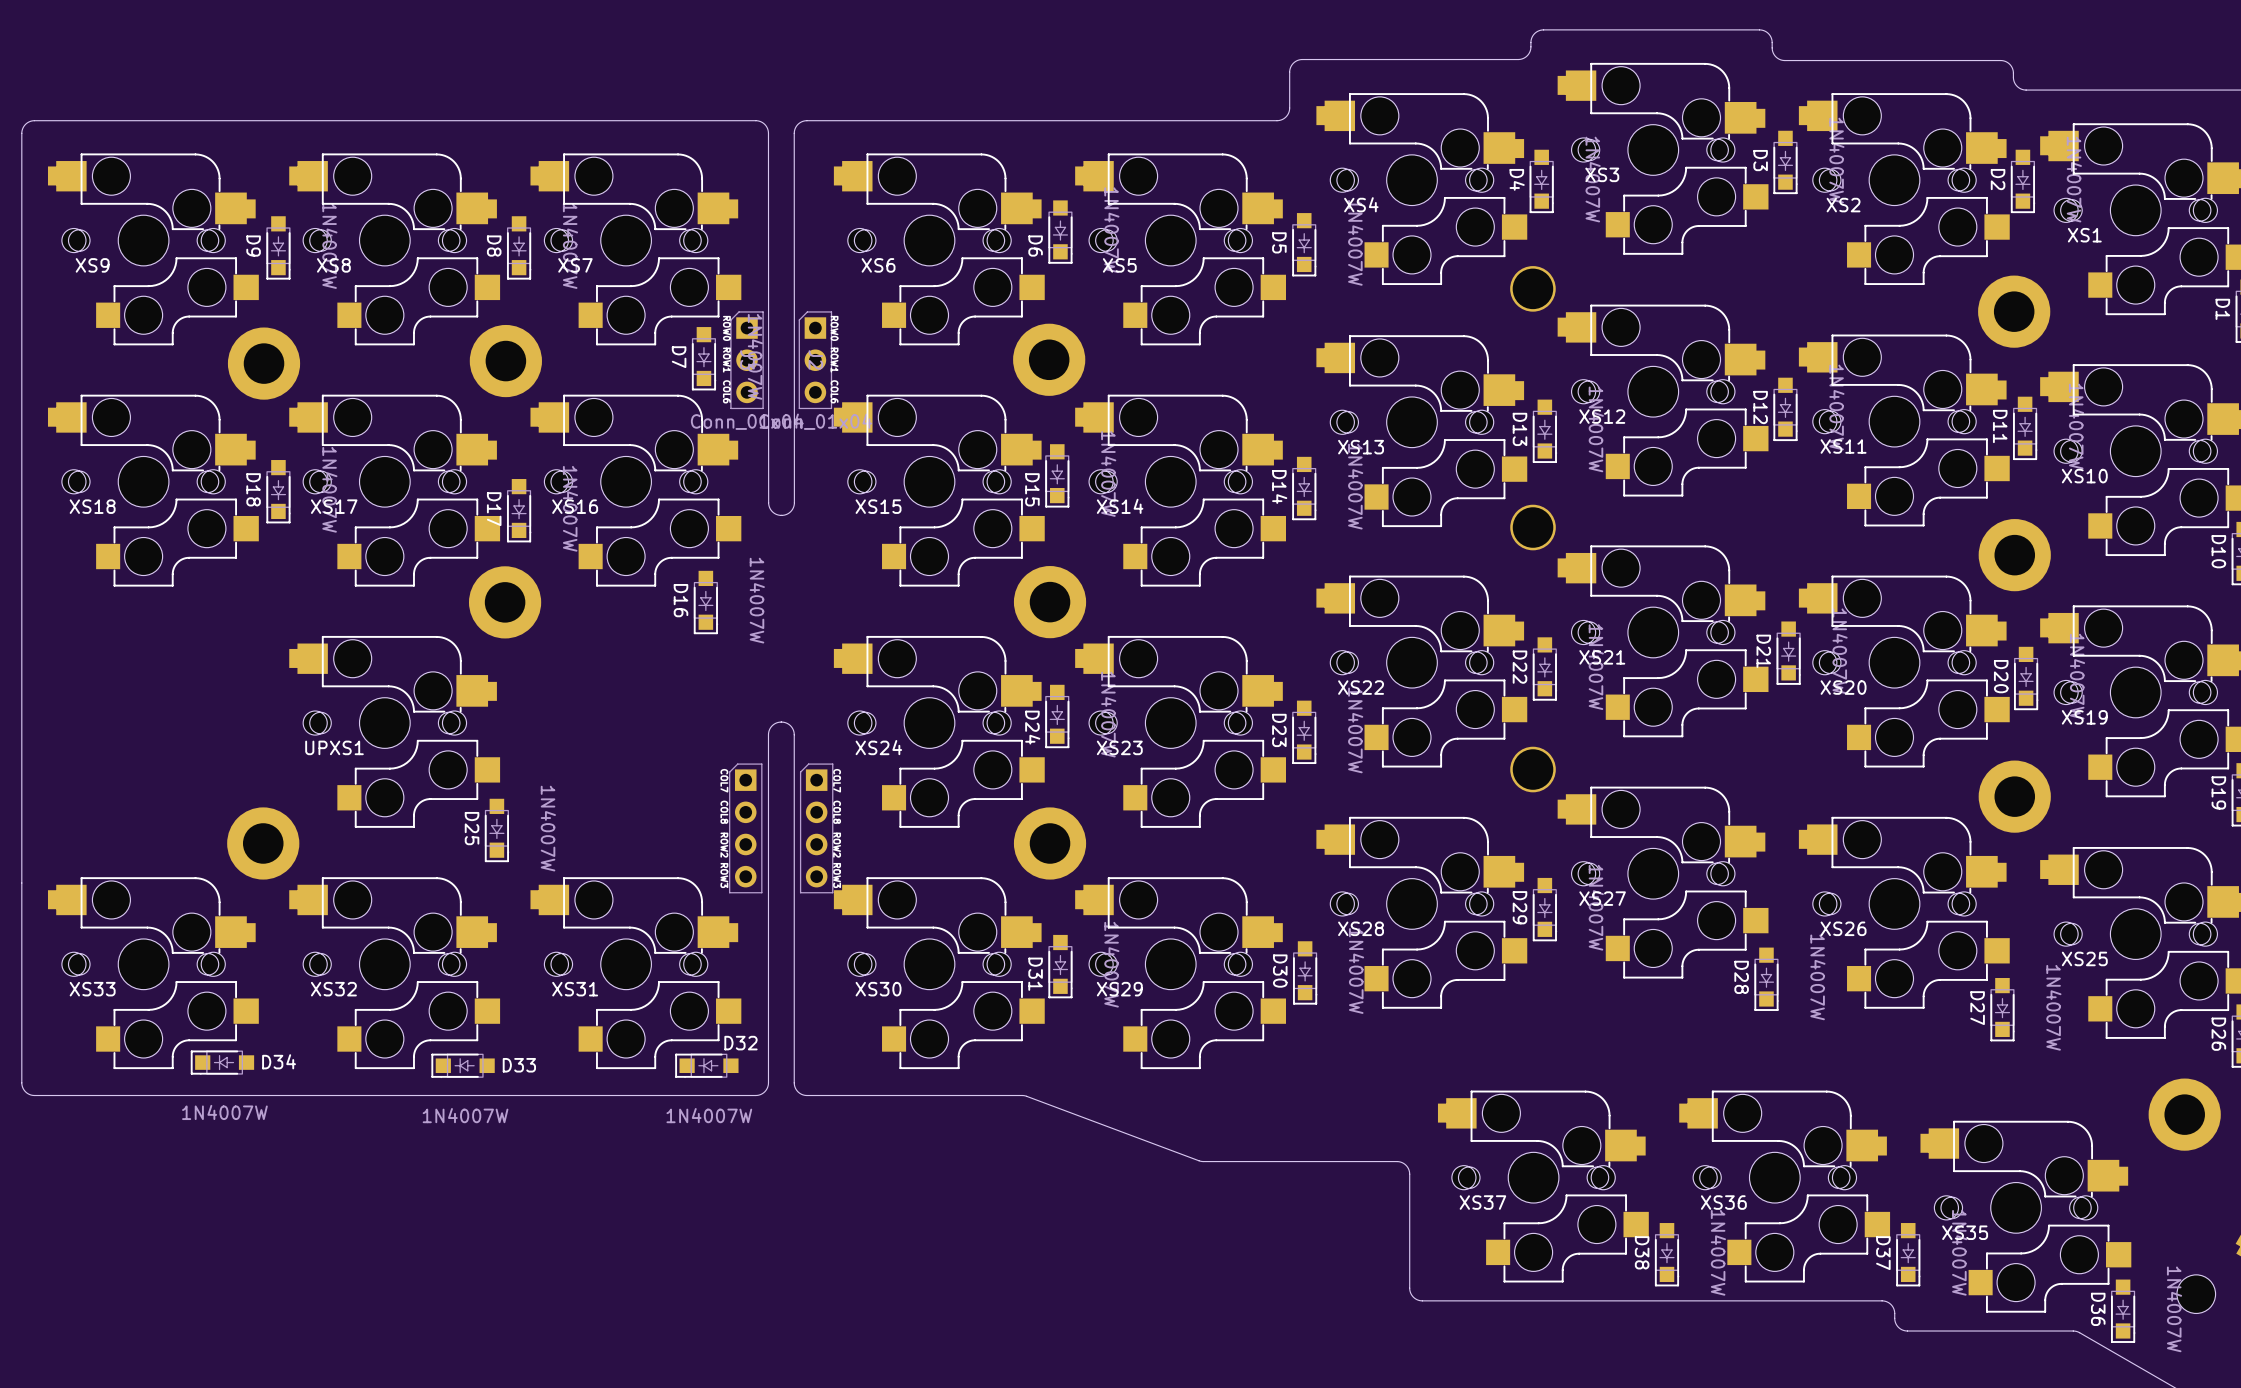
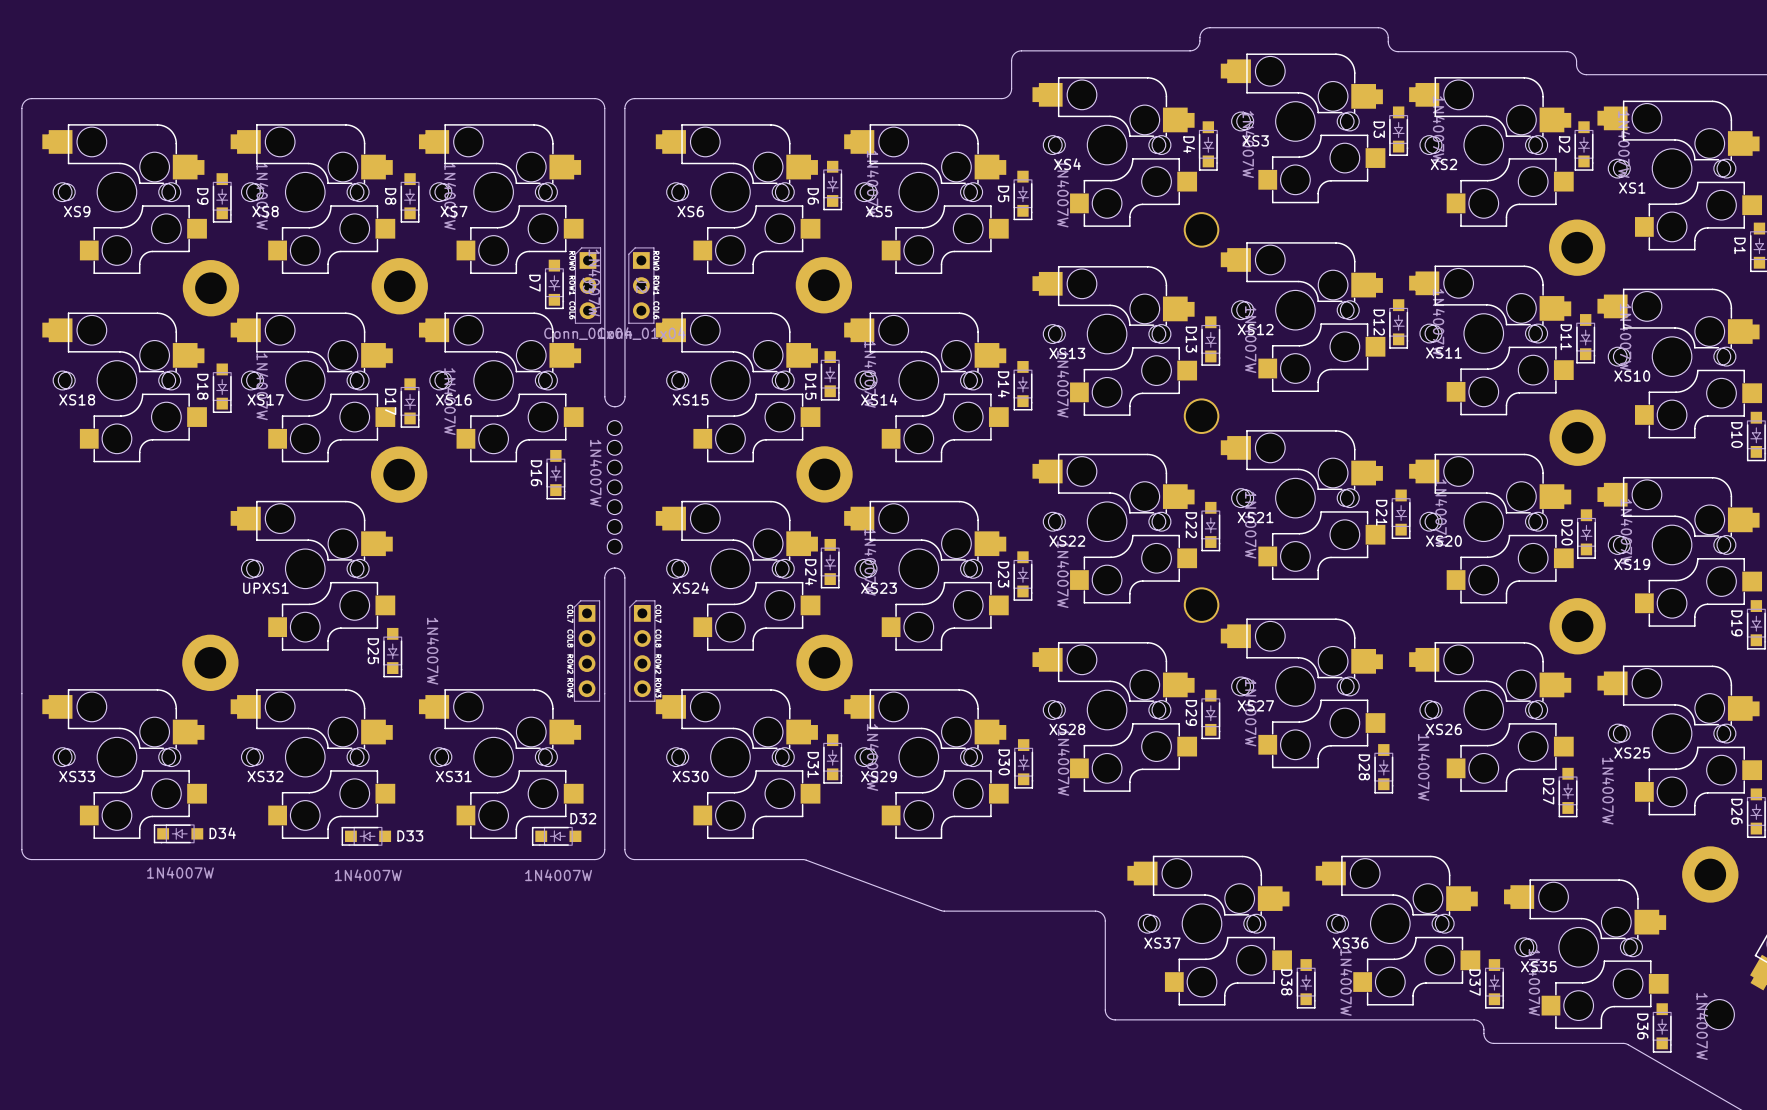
part: none -> (614, 487)

